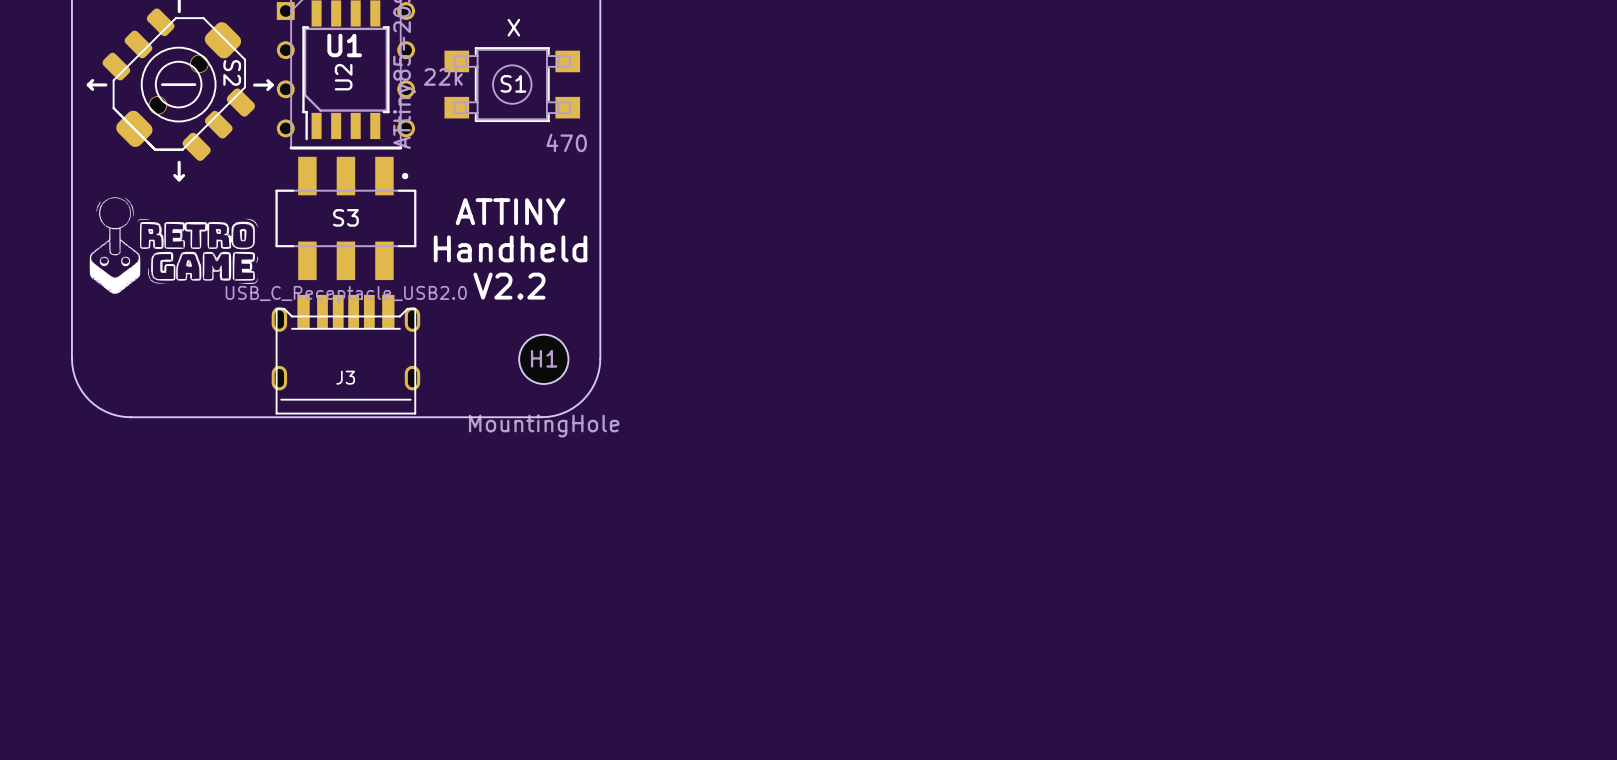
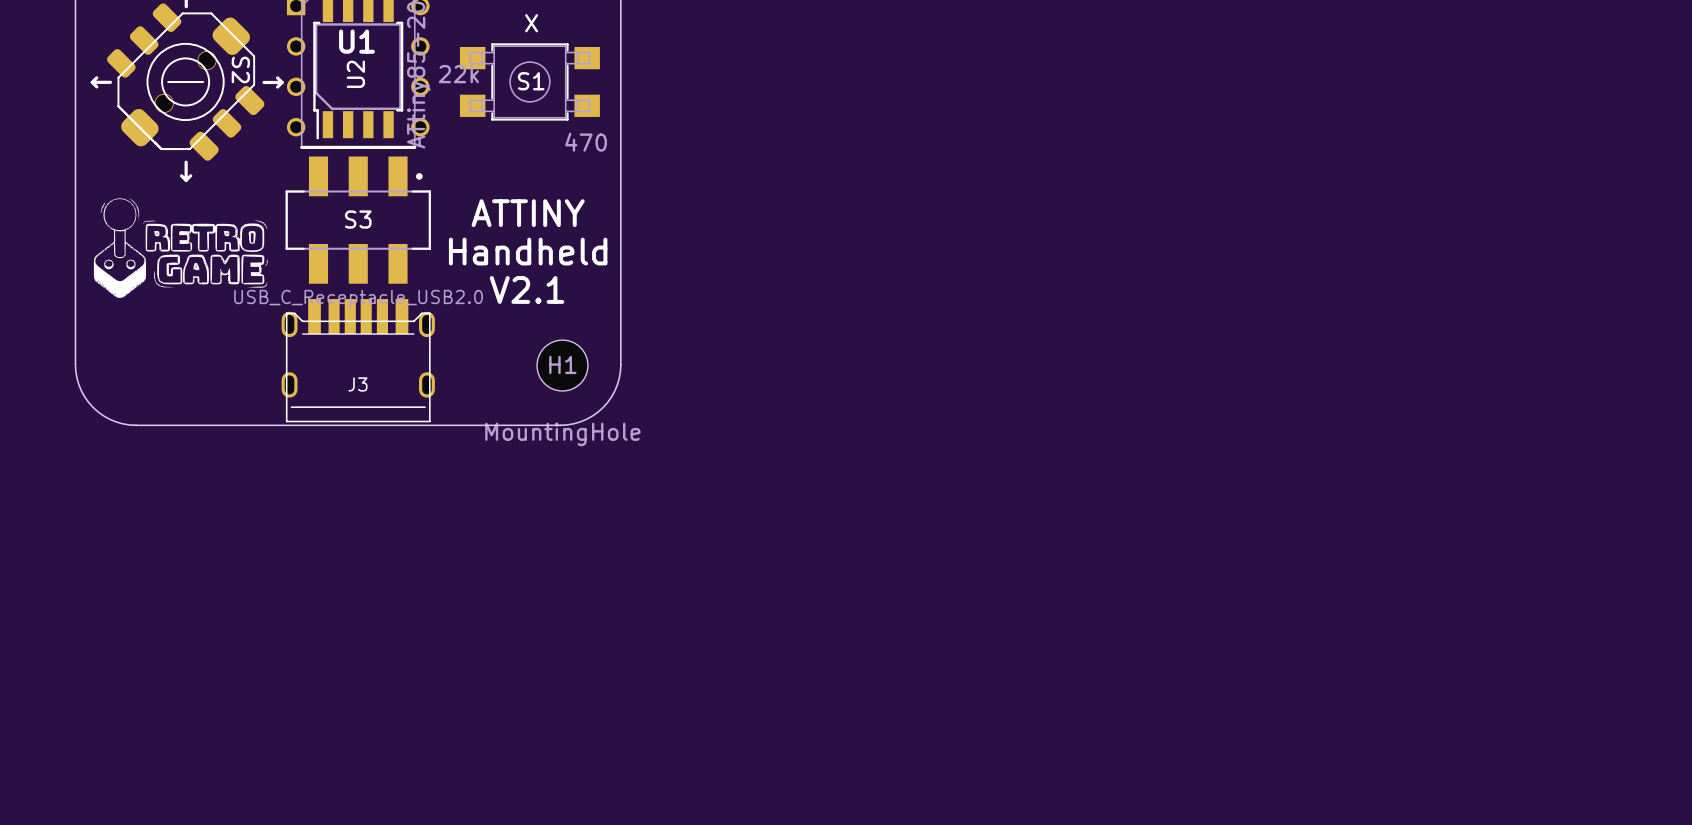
text: V2.2 (509, 286) -> V2.1 (527, 289)

